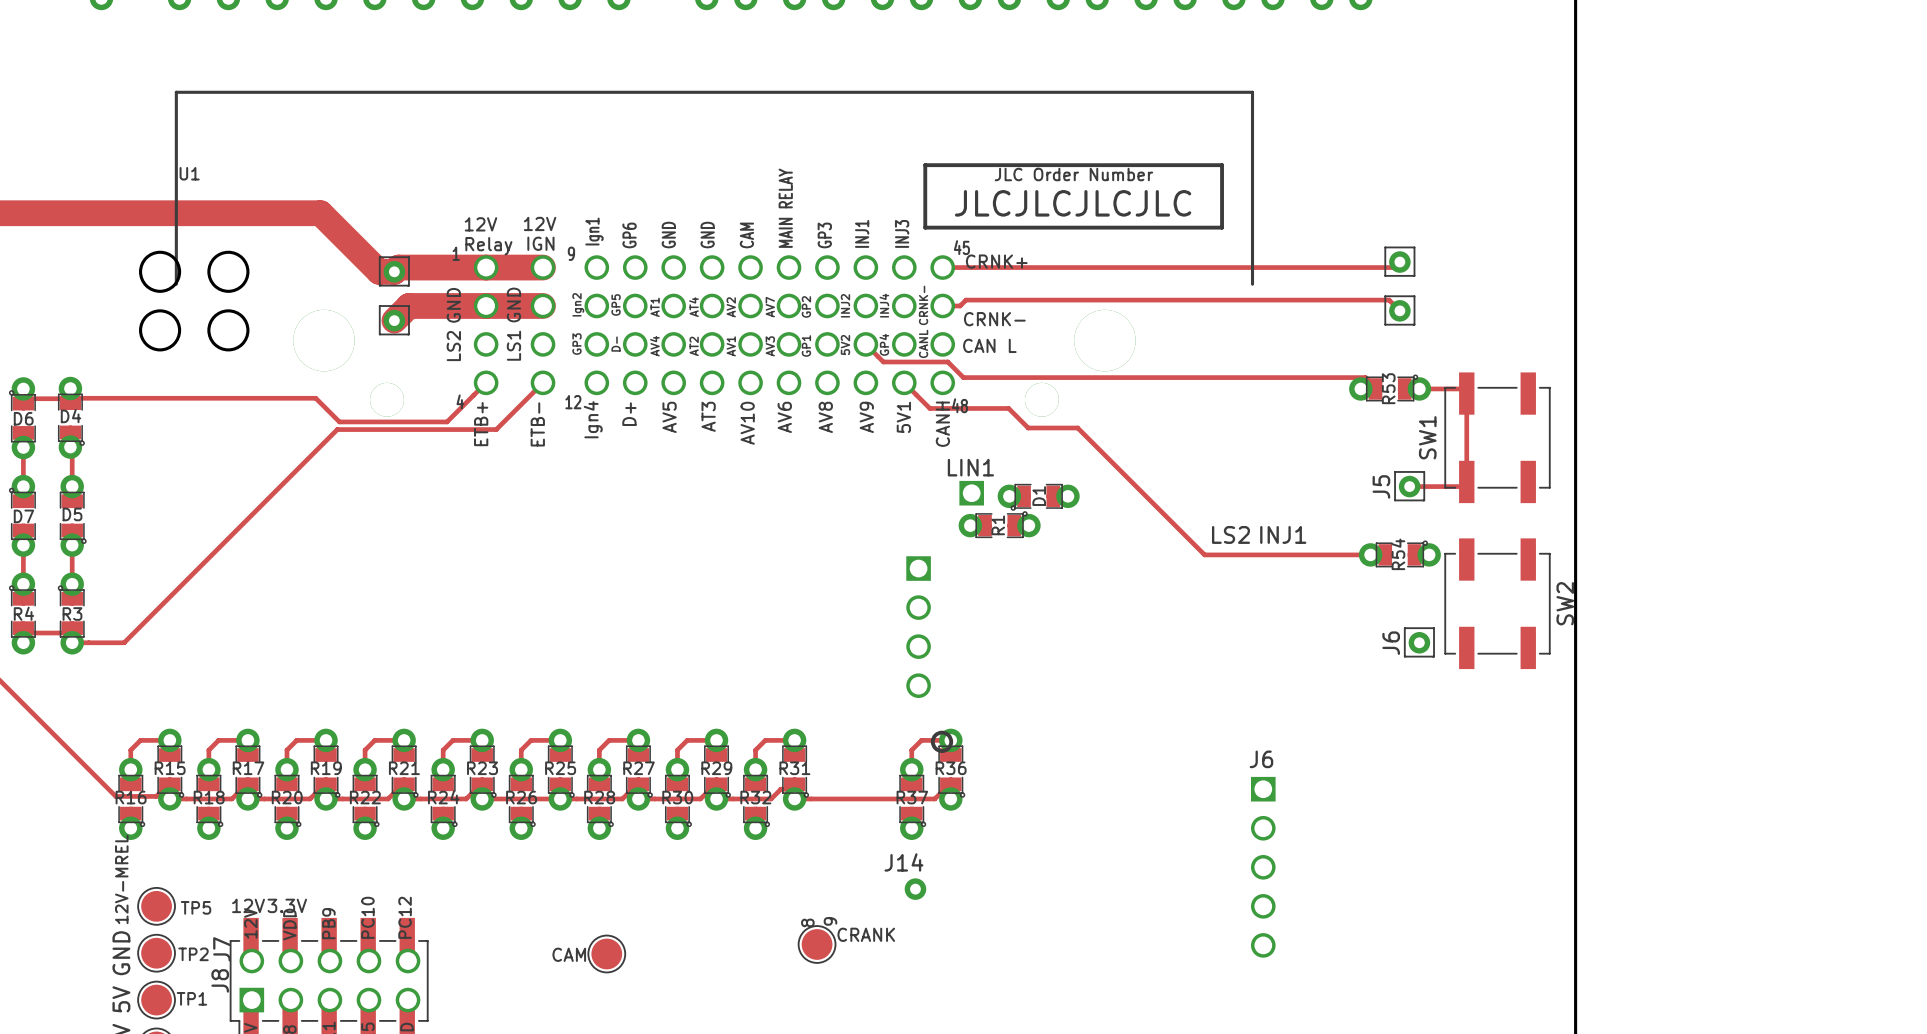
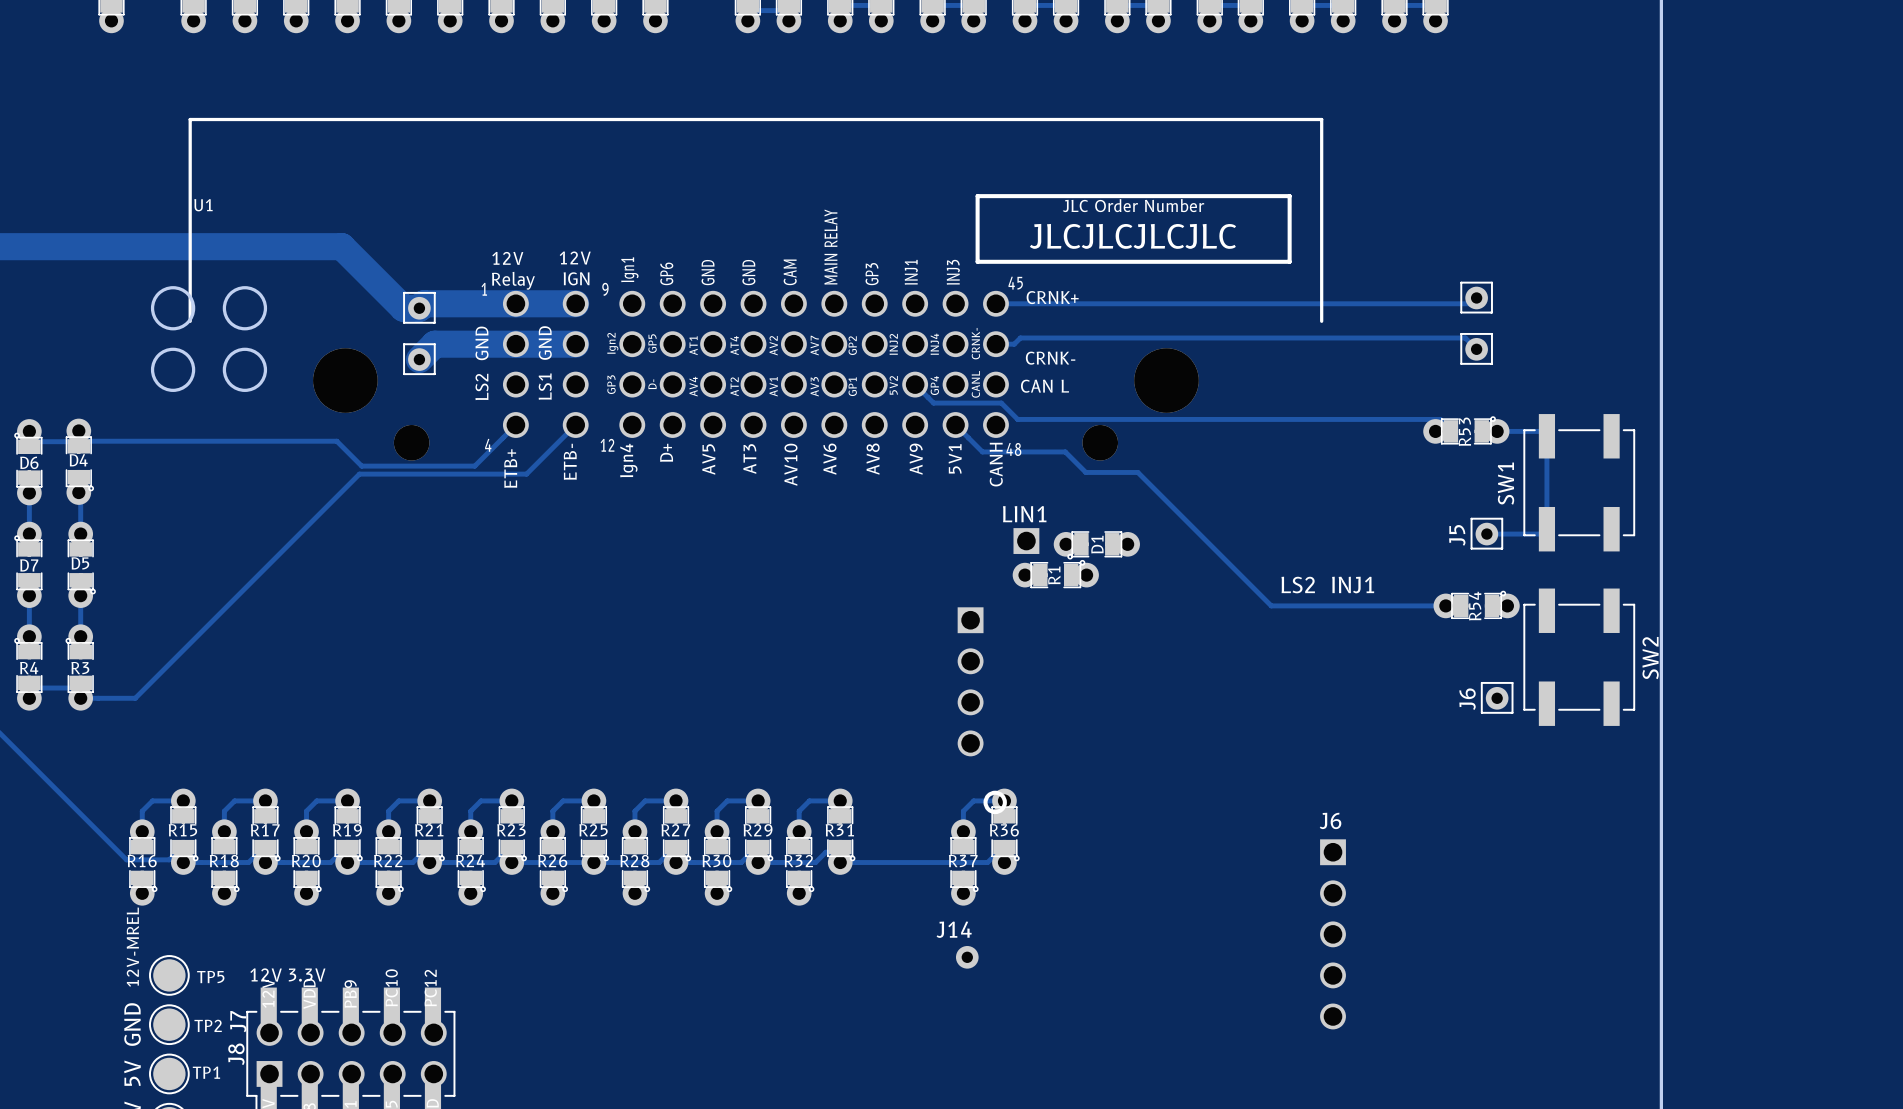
text: 9 (830, 921) -> none
text: 8 (807, 922) -> none
text: CRANK (866, 934) -> none
part: (817, 944) -> none
part: (606, 953) -> none
text: CAM (569, 954) -> none

